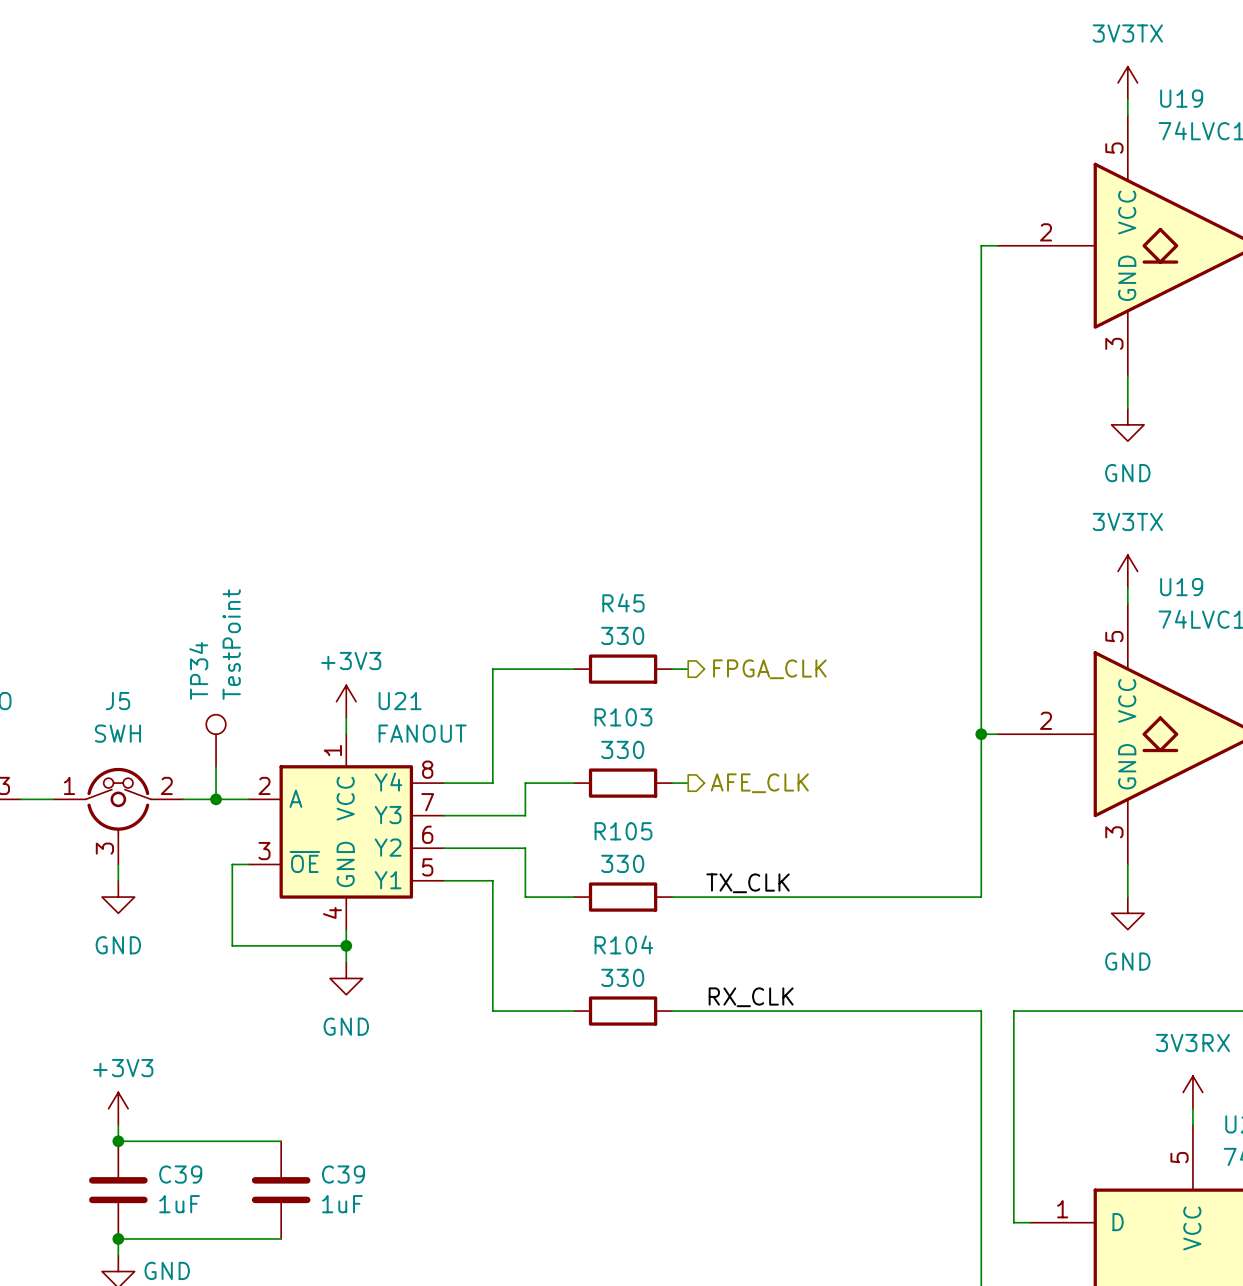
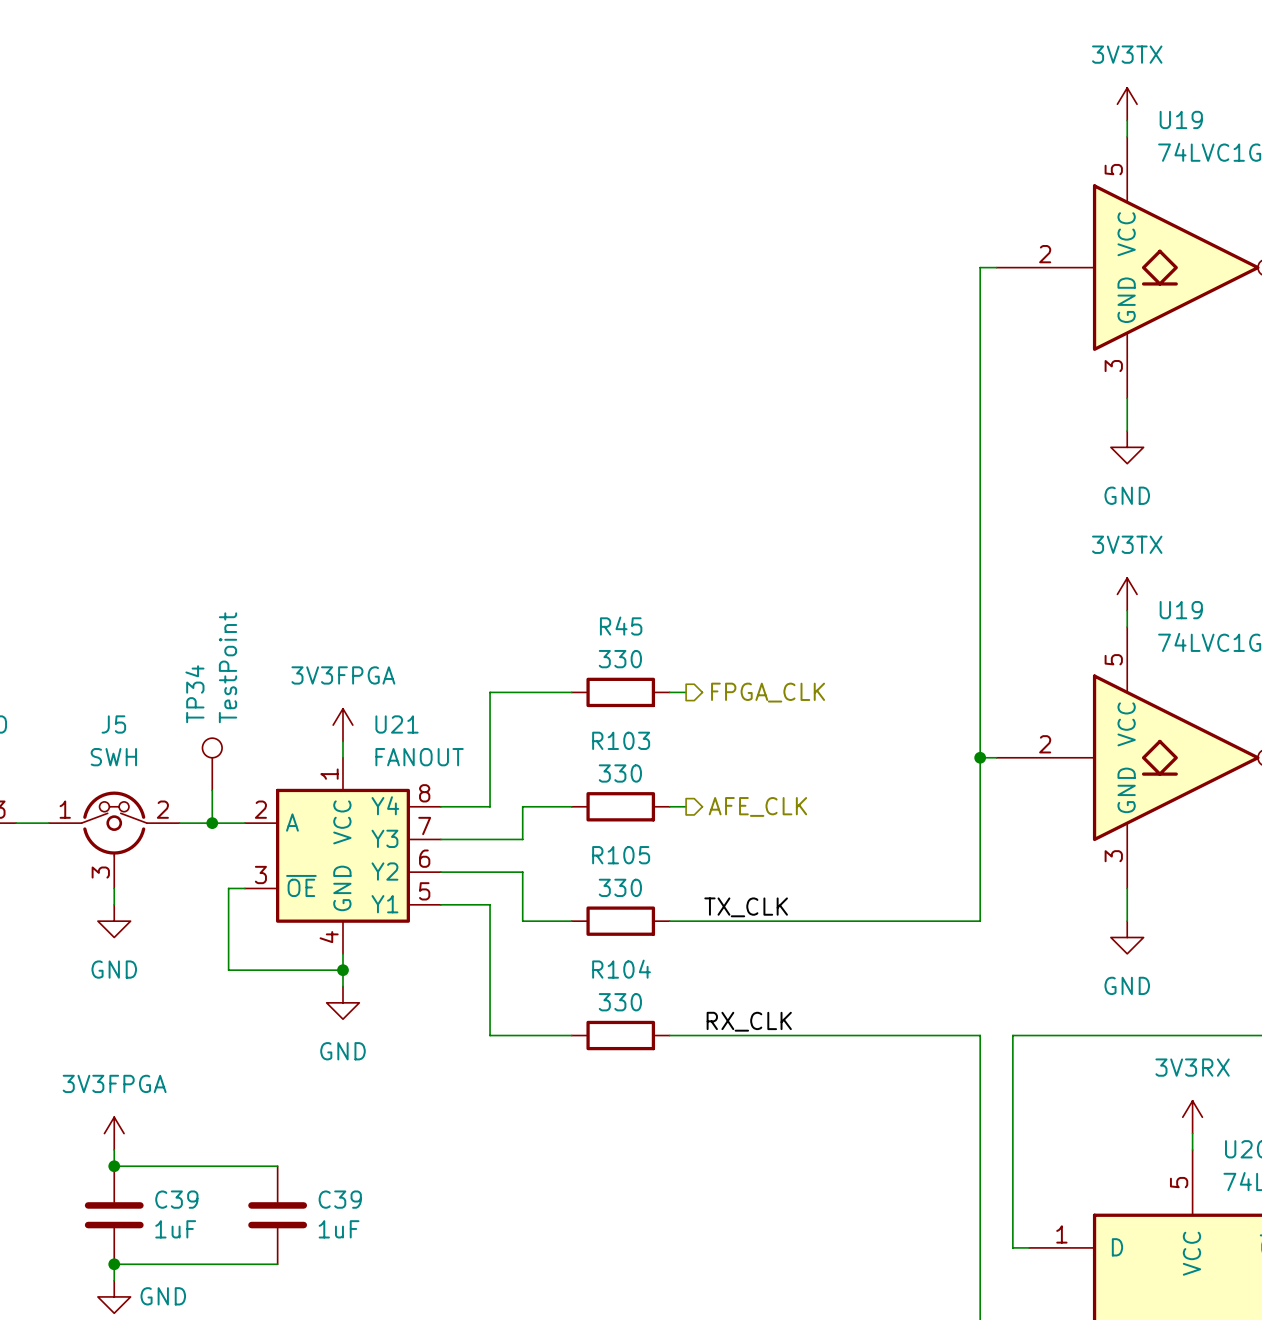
power symbol: +3V3 (346, 701) -> 3V3FPGA (342, 725)
power symbol: +3V3 (118, 1108) -> 3V3FPGA (114, 1133)

